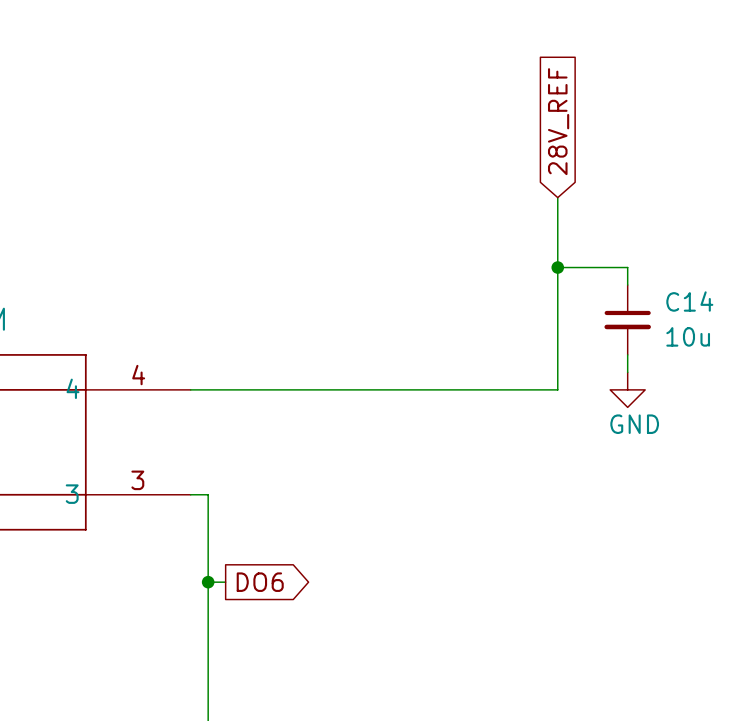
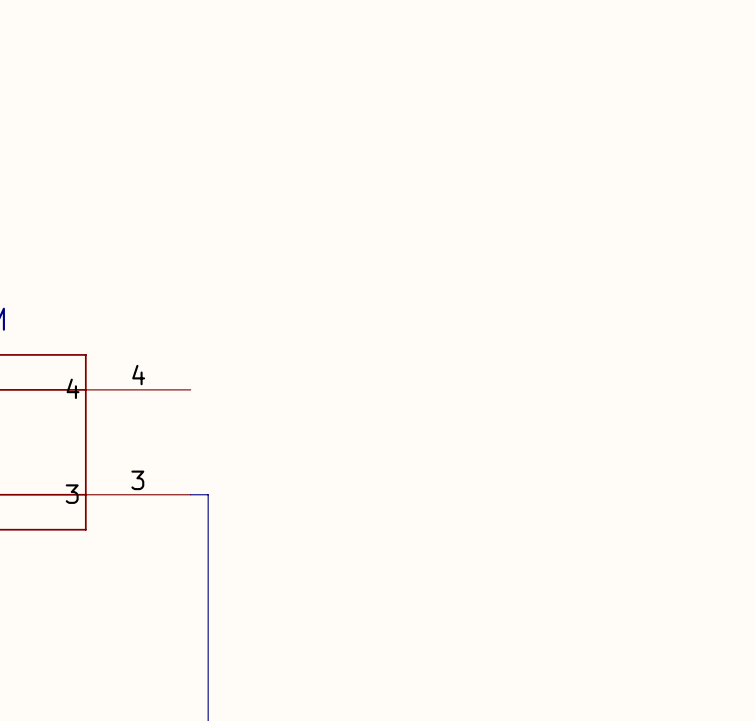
global label: 28V_REF (558, 121) -> none
wire: (557, 197) (557, 389) (190, 389) -> none
wire: (557, 267) (627, 267) (627, 285) -> none
junction: (557, 267) -> none
C14: 10u (627, 319) -> none
wire: (627, 354) (627, 372) -> none
power symbol: GND (627, 389) -> none
wire: (208, 582) (225, 582) -> none
junction: (208, 582) -> none
global label: DO6 (260, 582) -> none

